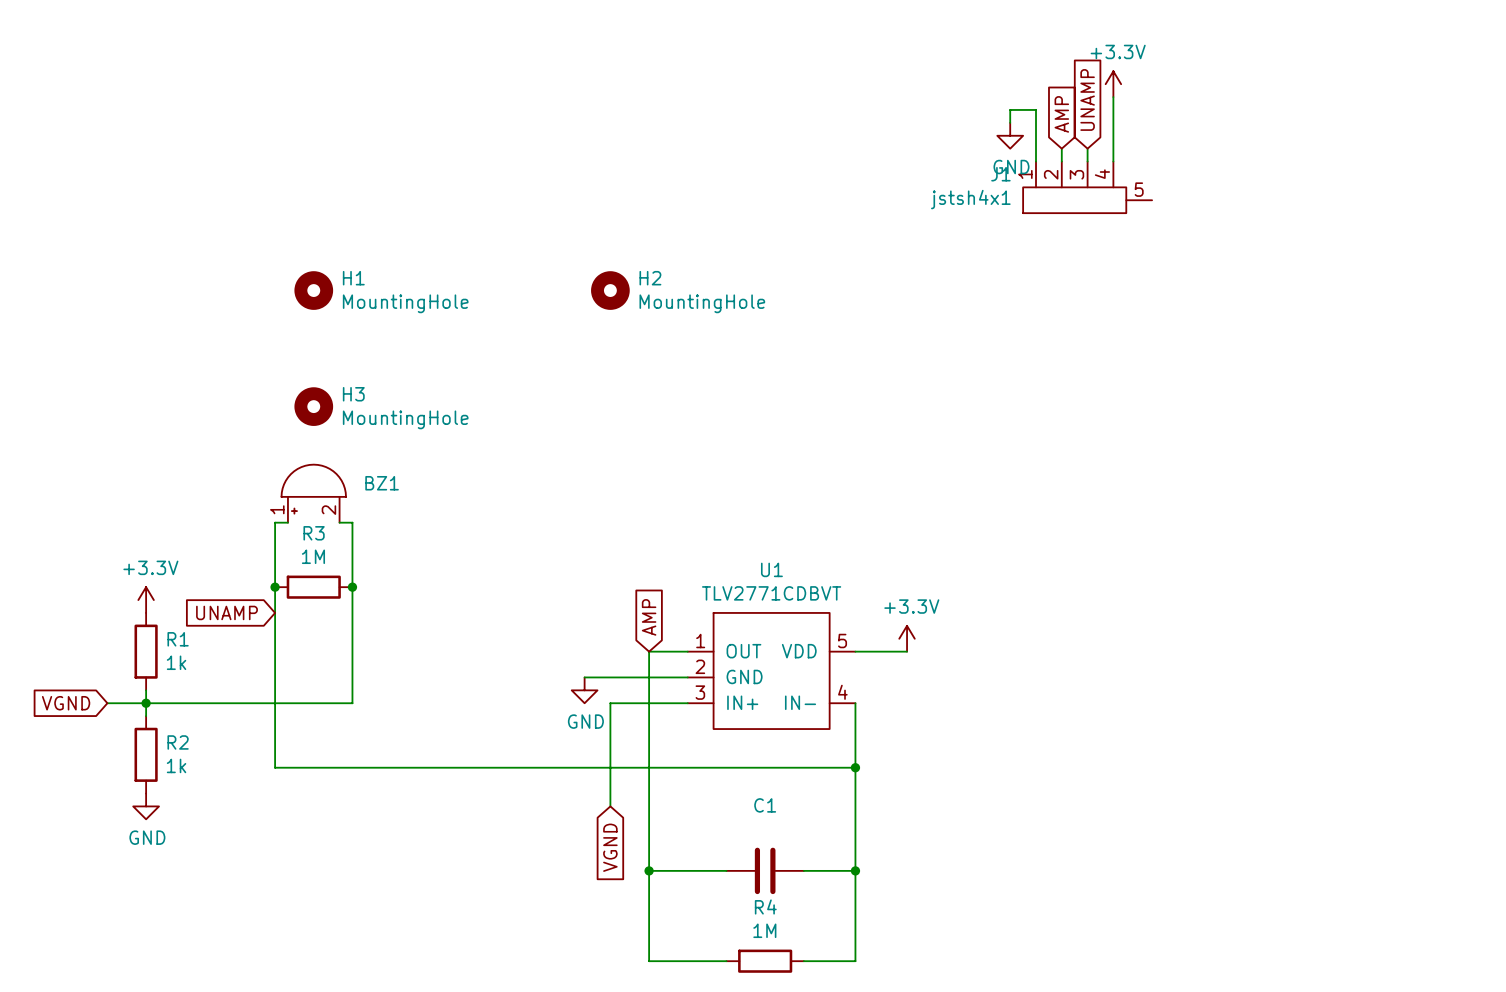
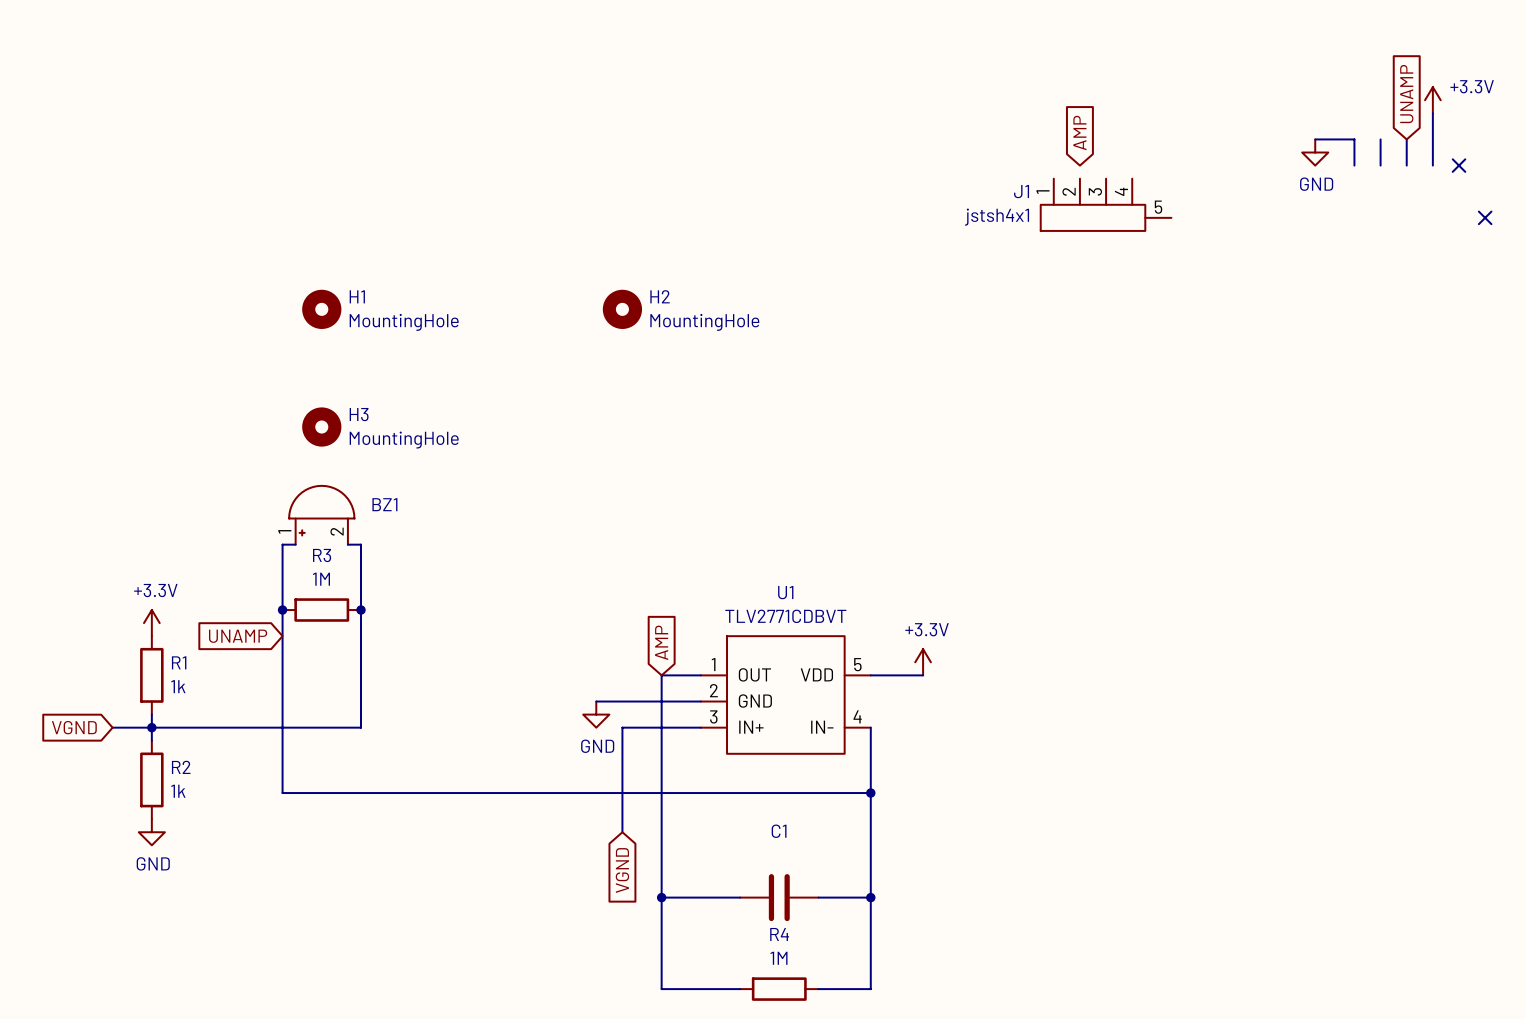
global label: none -> UNAMP (1406, 94)
power symbol: +3.3V (1113, 84) -> none
power symbol: none -> +3.3V (1432, 100)
wire: (1113, 97) (1113, 161) -> none
wire: none -> (1432, 113) (1432, 165)
global label: UNAMP (1087, 99) -> none
wire: (1010, 122) (1010, 109) (1036, 109) (1036, 161) -> none
wire: none -> (1315, 139) (1354, 139) (1354, 165)
wire: none -> (1380, 139) (1380, 165)
wire: none -> (1406, 139) (1406, 165)
power symbol: GND (1010, 135) -> none
power symbol: none -> GND (1315, 152)
wire: (1061, 148) (1061, 161) -> none
wire: (1087, 148) (1087, 161) -> none
no-connect mark: none -> (1459, 165)
no-connect mark: none -> (1485, 217)

